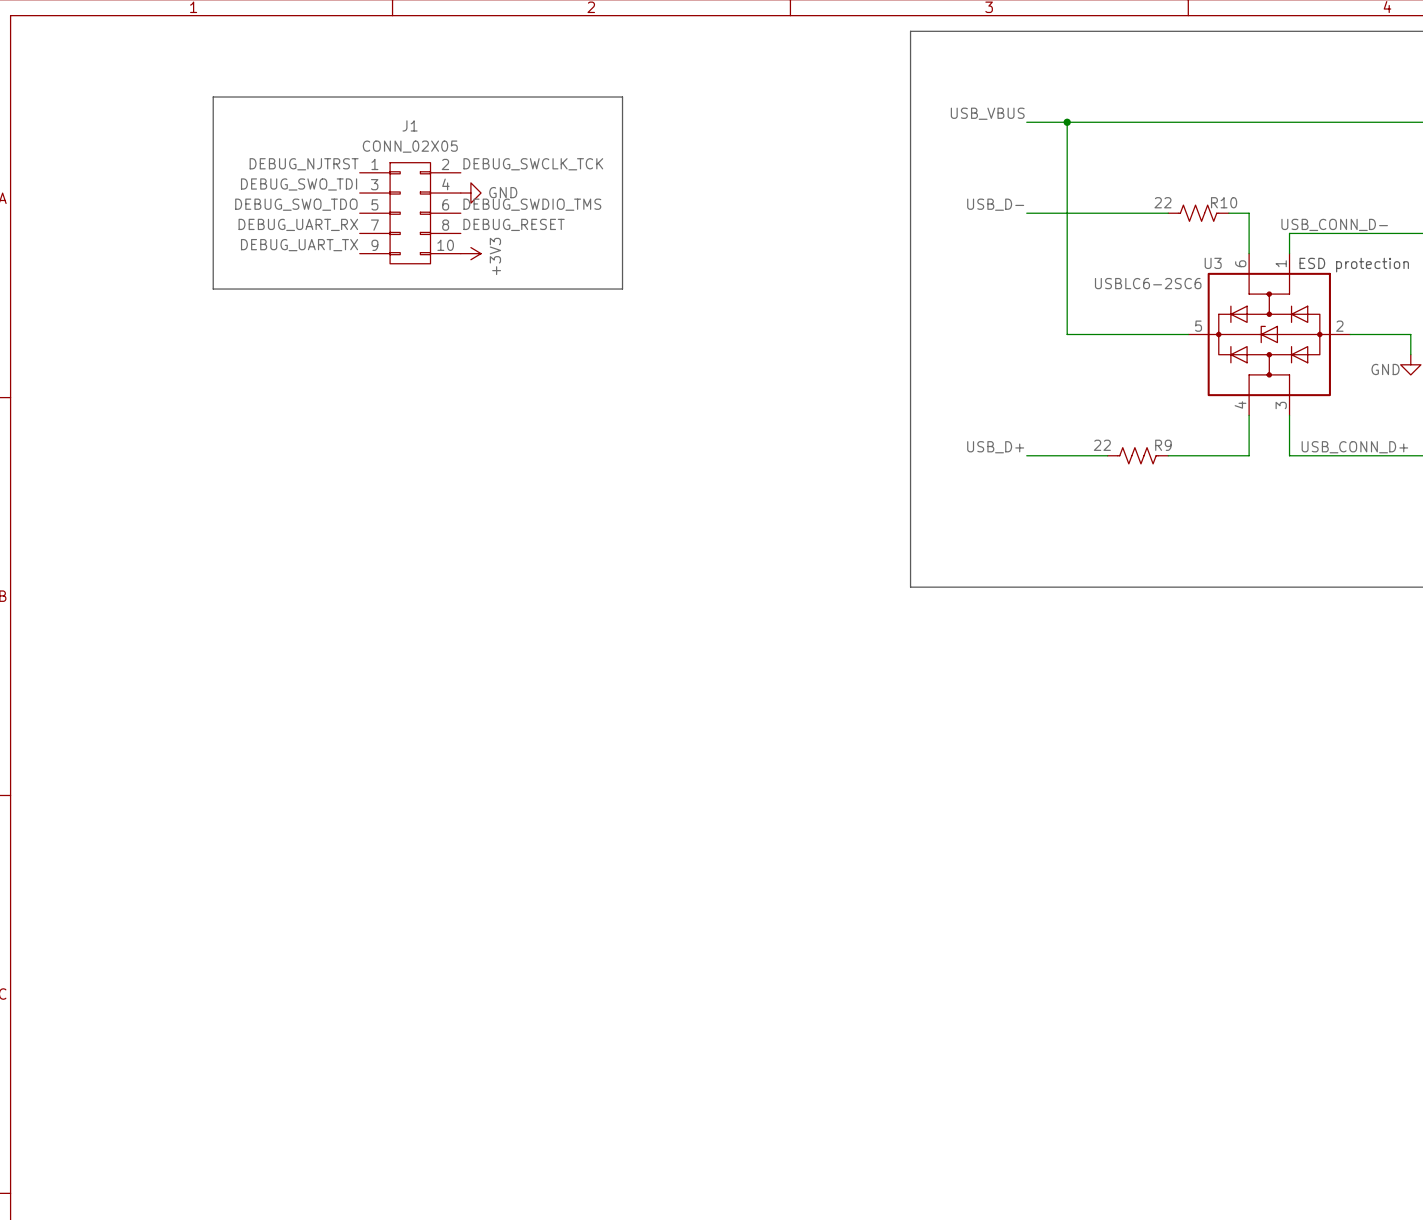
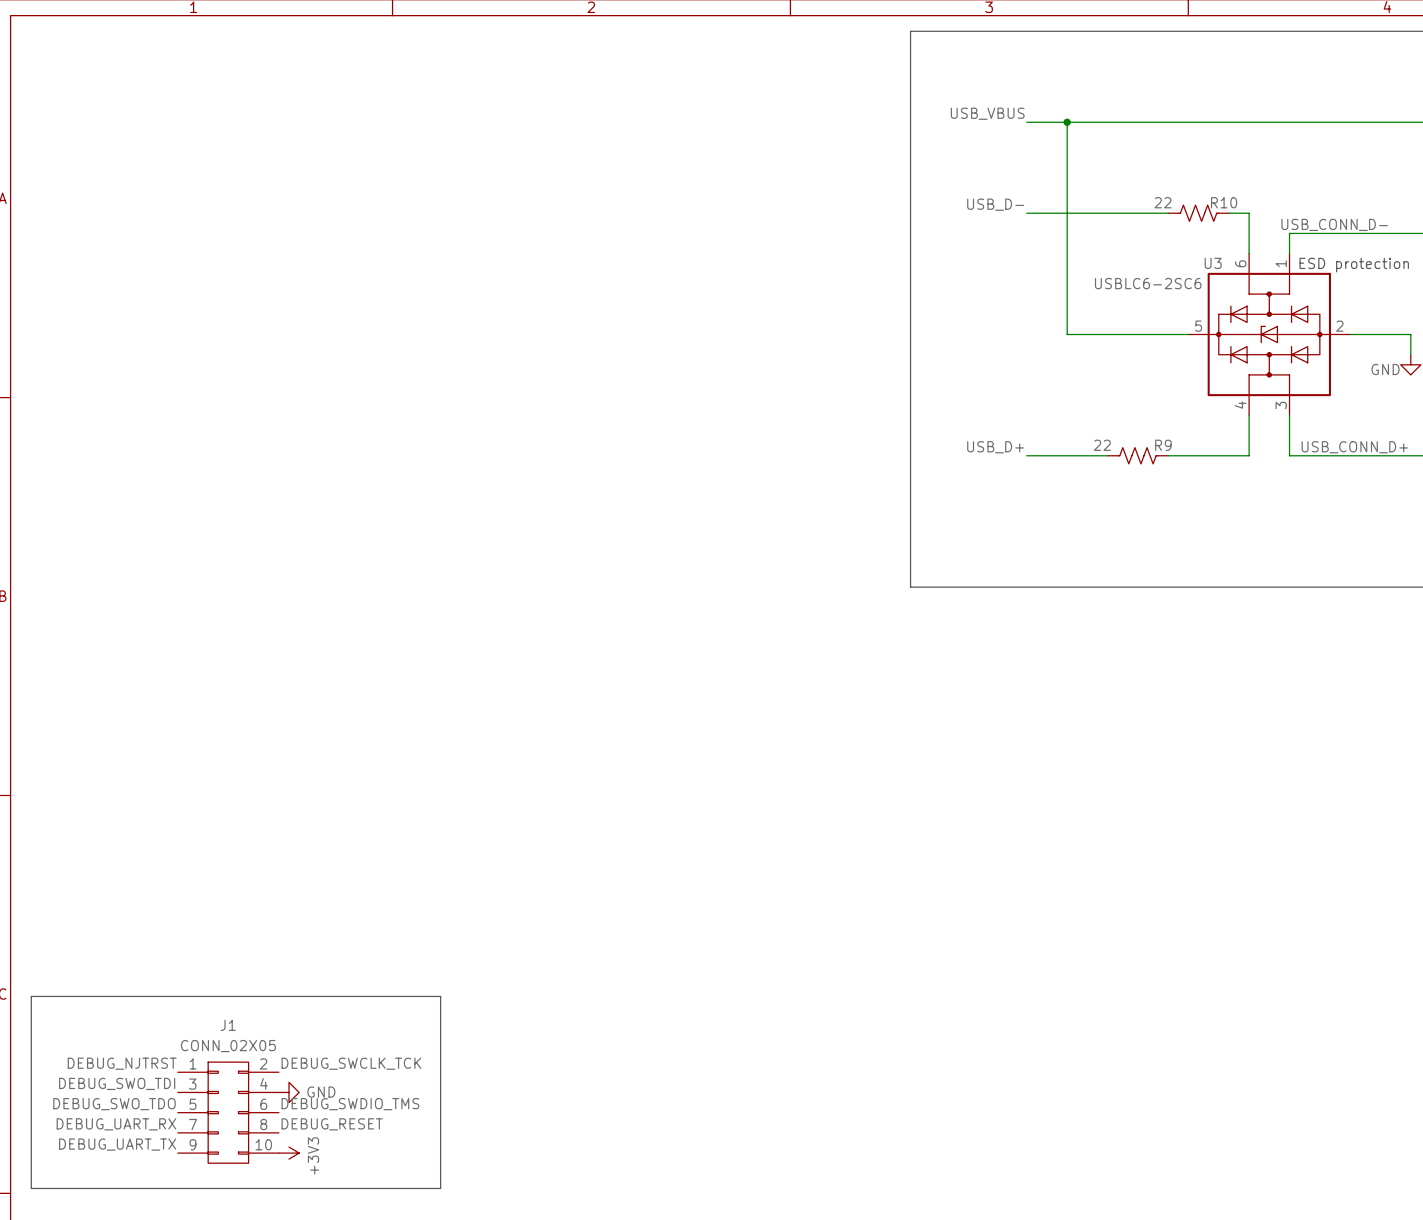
line: (213, 97) (622, 97) (622, 289) (213, 289) (213, 97) -> none
label: DEBUG_NJTRST (304, 164) -> none
label: DEBUG_SWCLK_TCK (533, 164) -> none
label: DEBUG_SWO_TDI (299, 184) -> none
power symbol: GND (470, 193) -> none
label: DEBUG_SWO_TDO (296, 204) -> none
label: DEBUG_SWDIO_TMS (532, 204) -> none
J1 position: (410, 213) -> (228, 1112)
label: DEBUG_UART_RX (298, 224) -> none
label: DEBUG_RESET (514, 224) -> none
label: DEBUG_UART_TX (299, 245) -> none
power symbol: +3V3 (470, 253) -> none
line: none -> (31, 996) (440, 996) (440, 1188) (31, 1188) (31, 996)
label: none -> DEBUG_NJTRST (122, 1063)
label: none -> DEBUG_SWCLK_TCK (351, 1063)
label: none -> DEBUG_SWO_TDI (117, 1083)
power symbol: none -> GND (289, 1092)
label: none -> DEBUG_SWO_TDO (114, 1104)
label: none -> DEBUG_SWDIO_TMS (350, 1104)
label: none -> DEBUG_UART_RX (116, 1124)
label: none -> DEBUG_RESET (332, 1124)
label: none -> DEBUG_UART_TX (117, 1144)
power symbol: none -> +3V3 (289, 1153)

